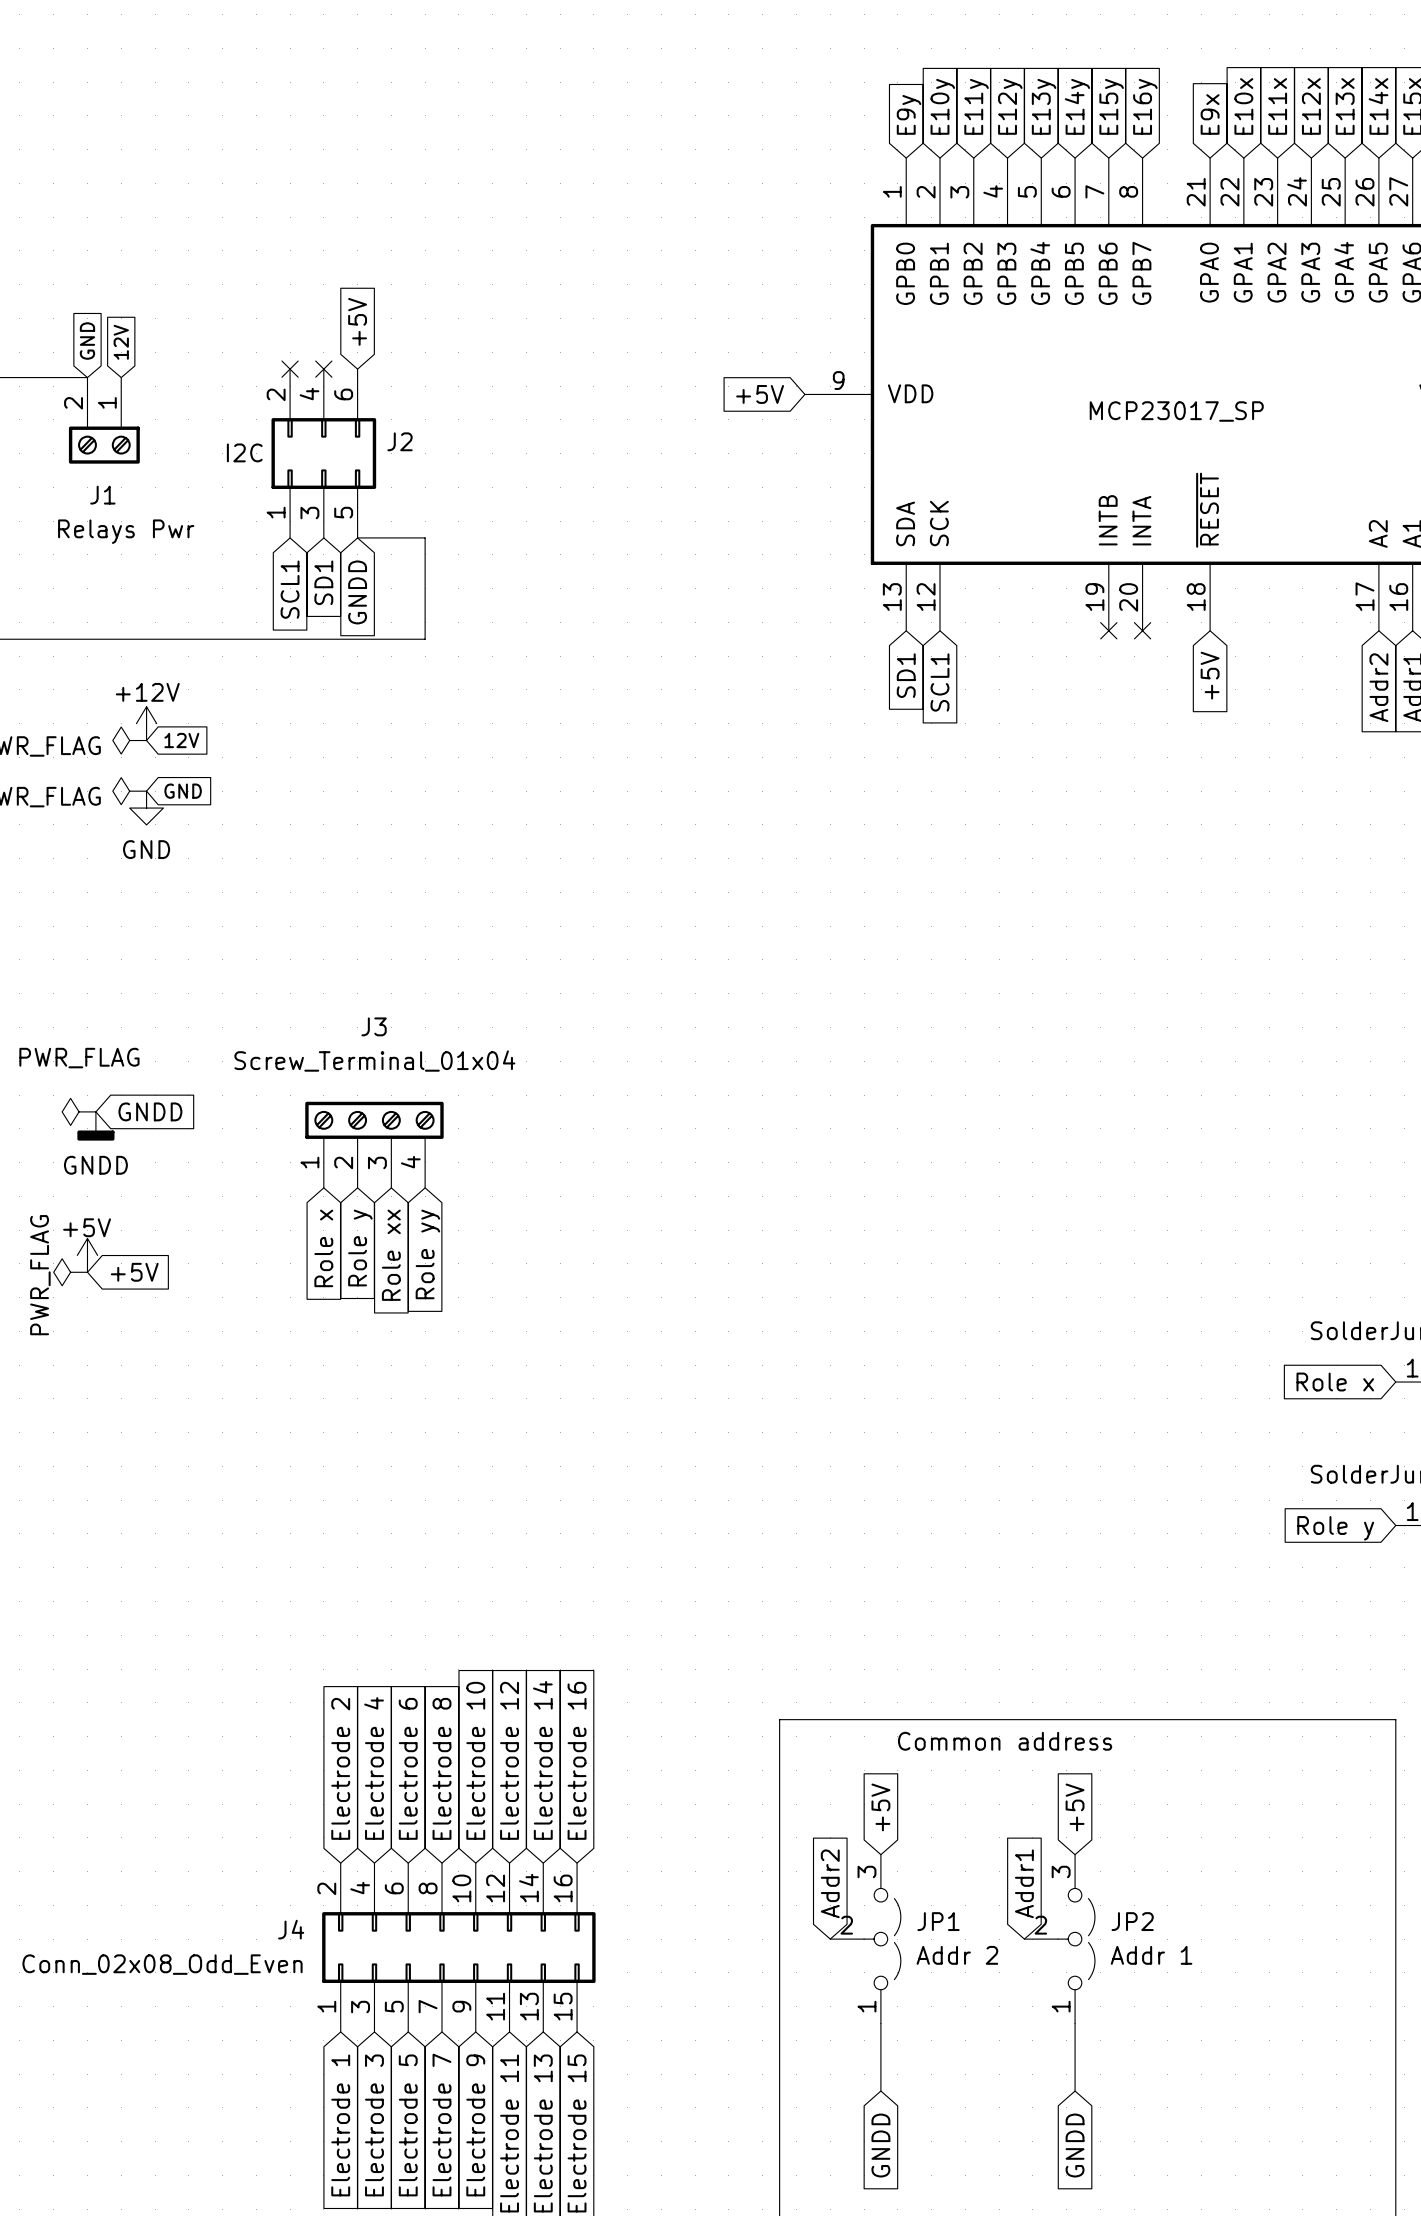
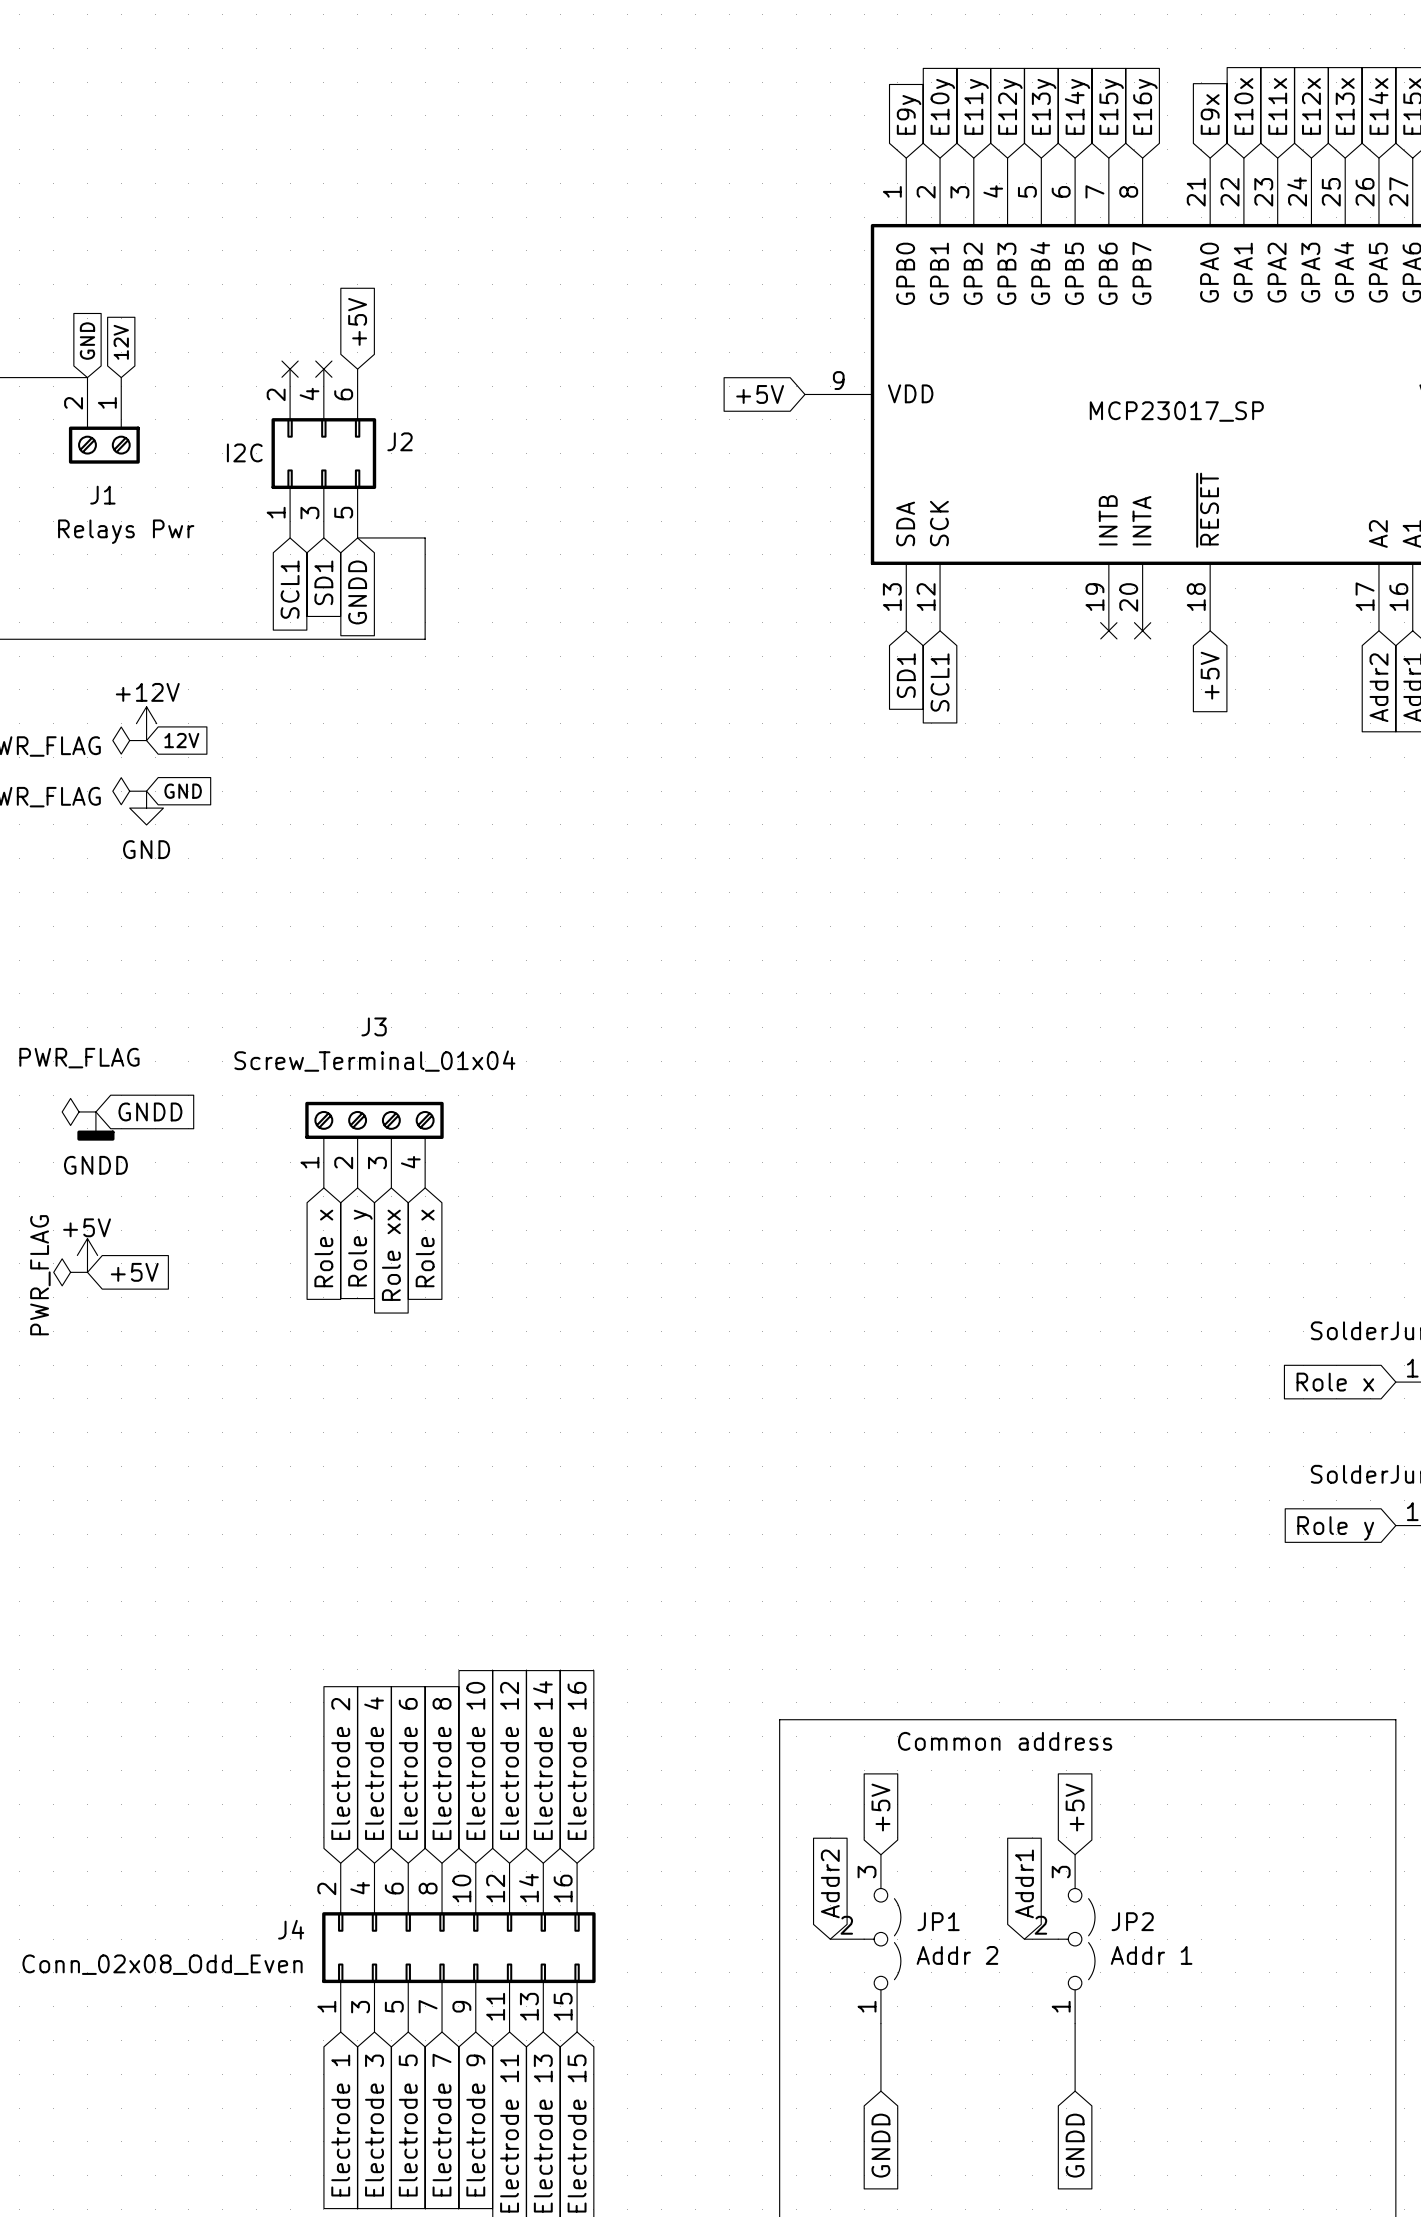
global label: Role yy (427, 1254) -> Role x (425, 1248)

